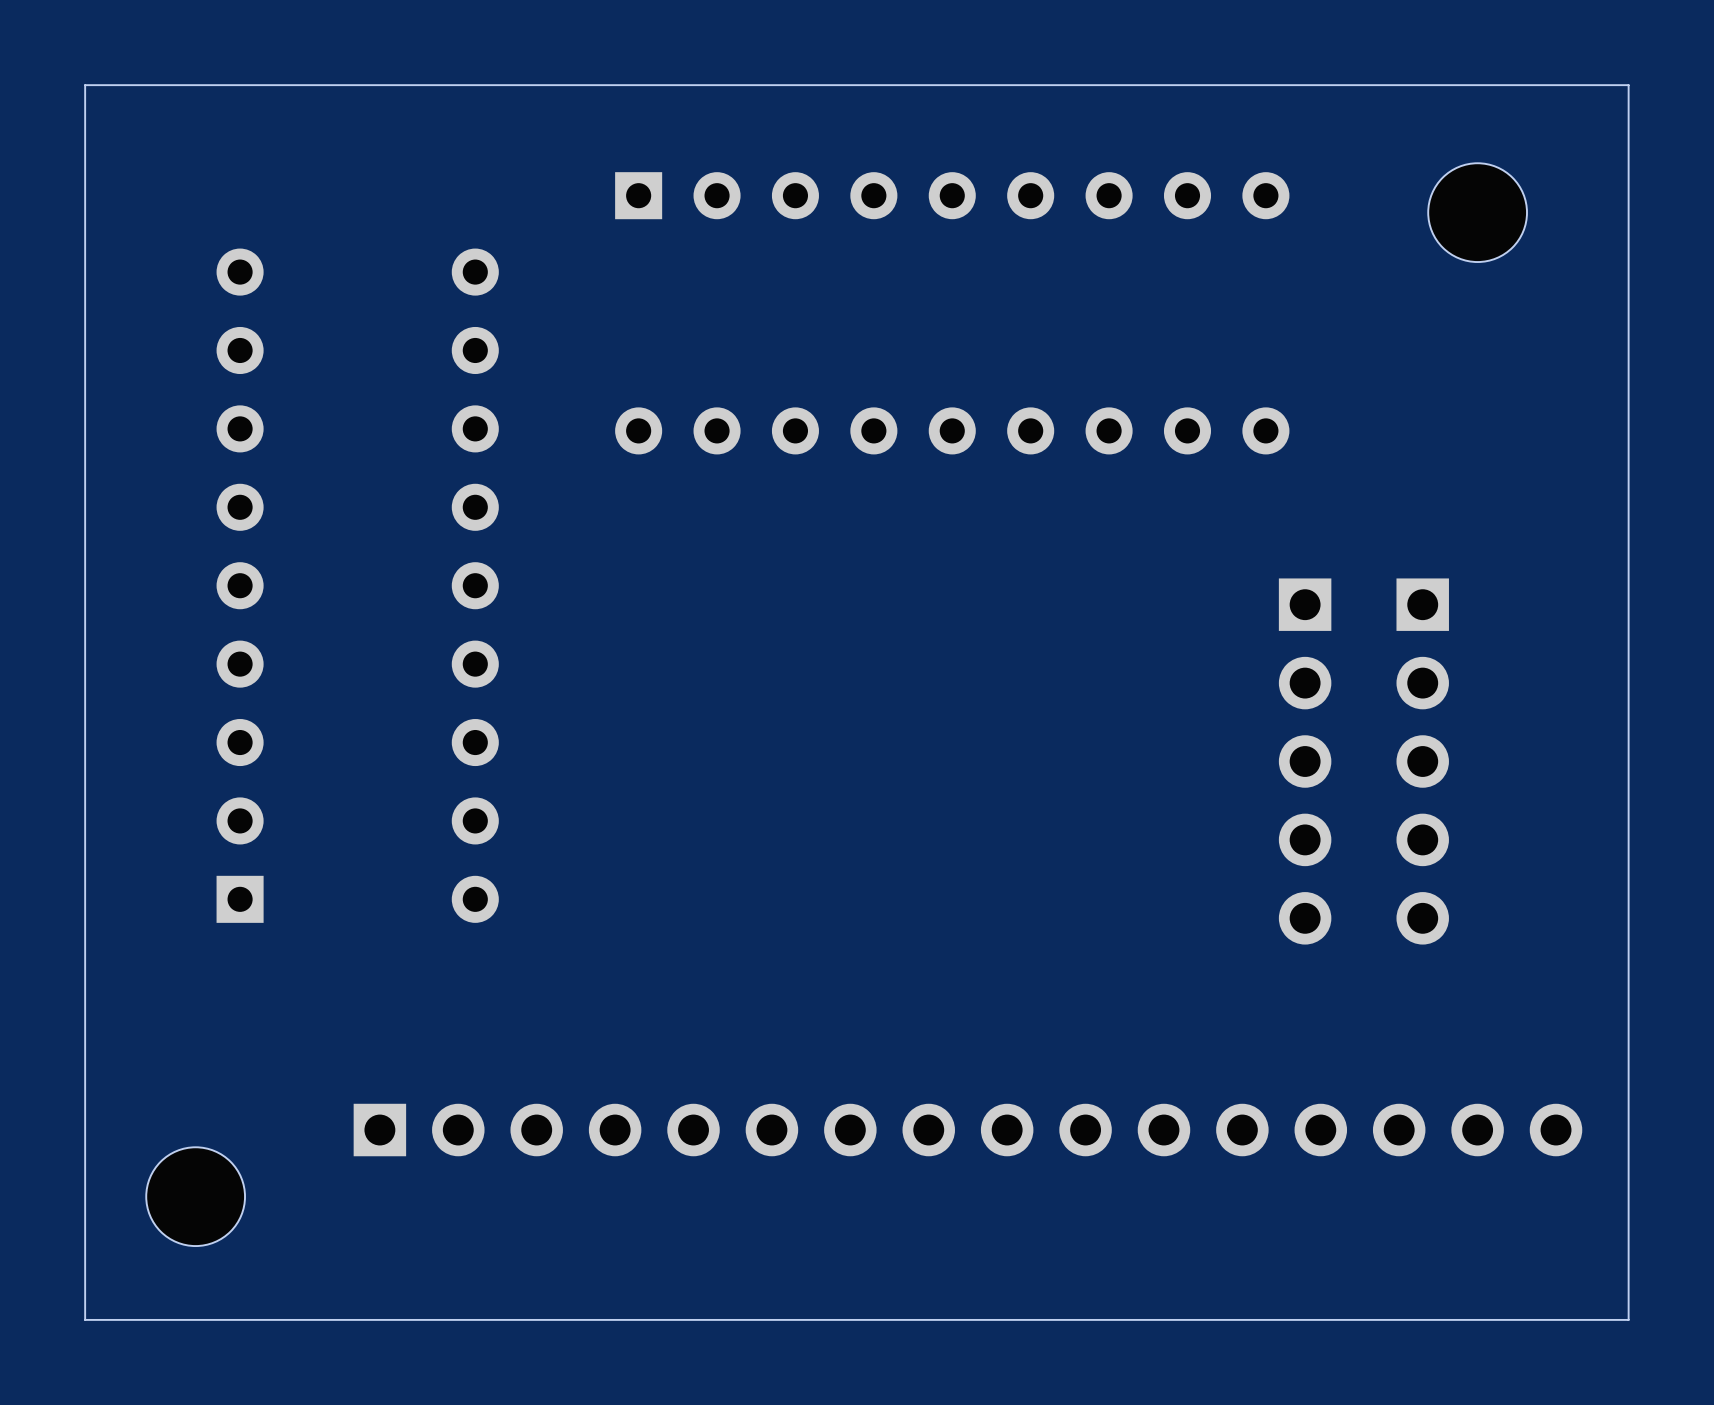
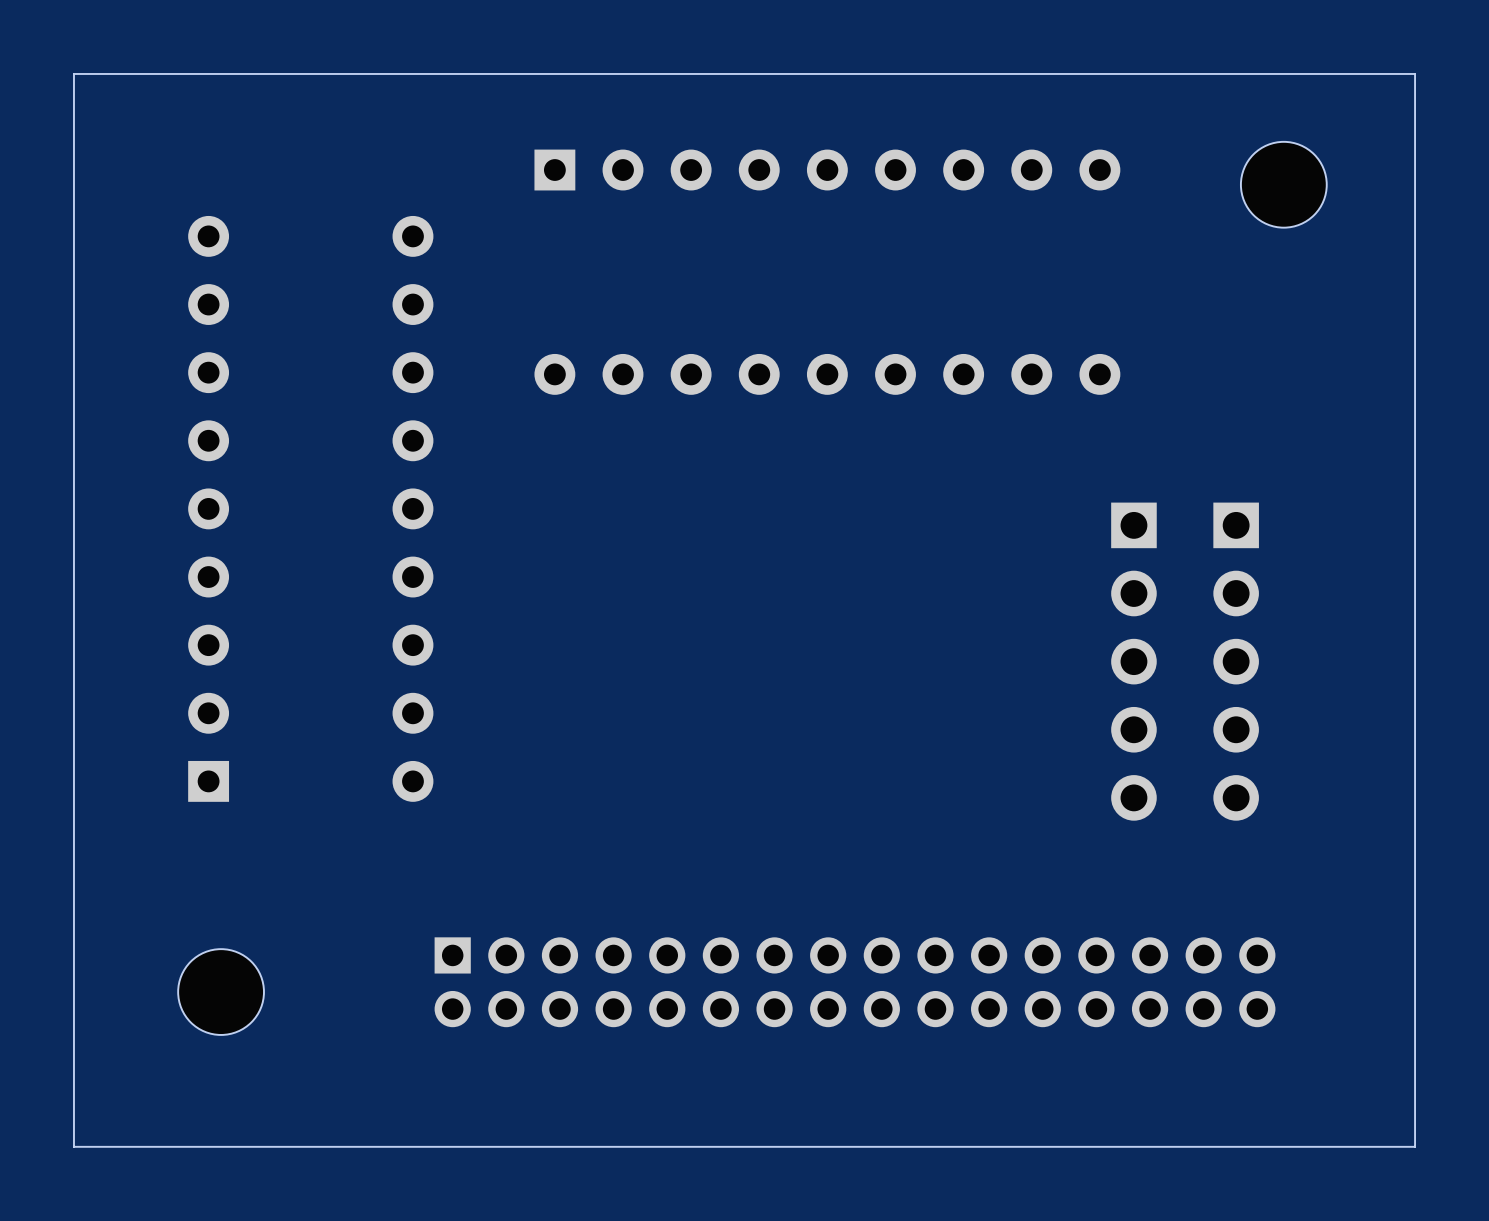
part footprint: [353, 1103, 1583, 1157] -> [434, 937, 1276, 1028]
part position: (195, 1196) -> (221, 992)

